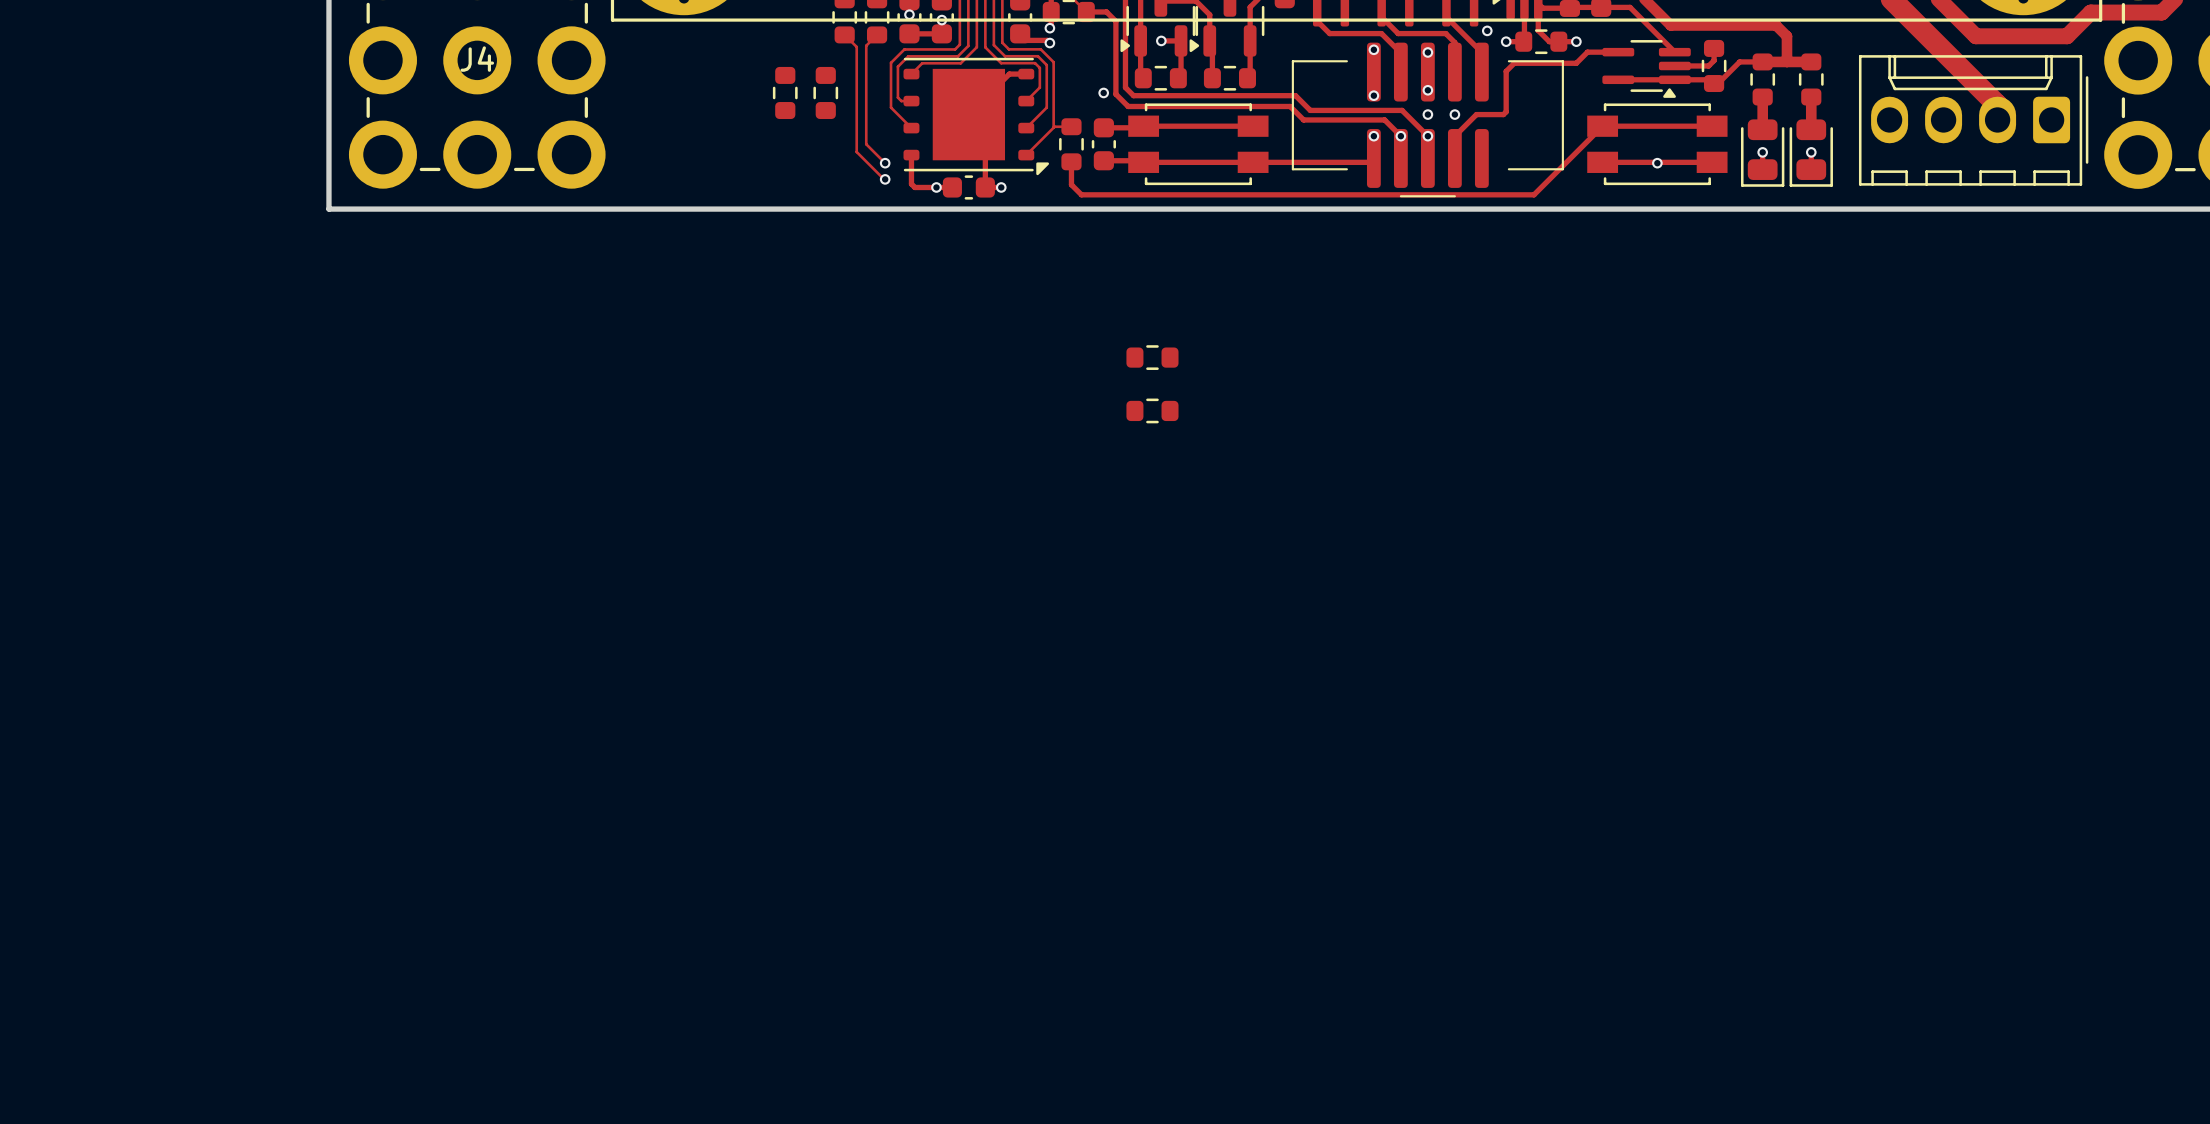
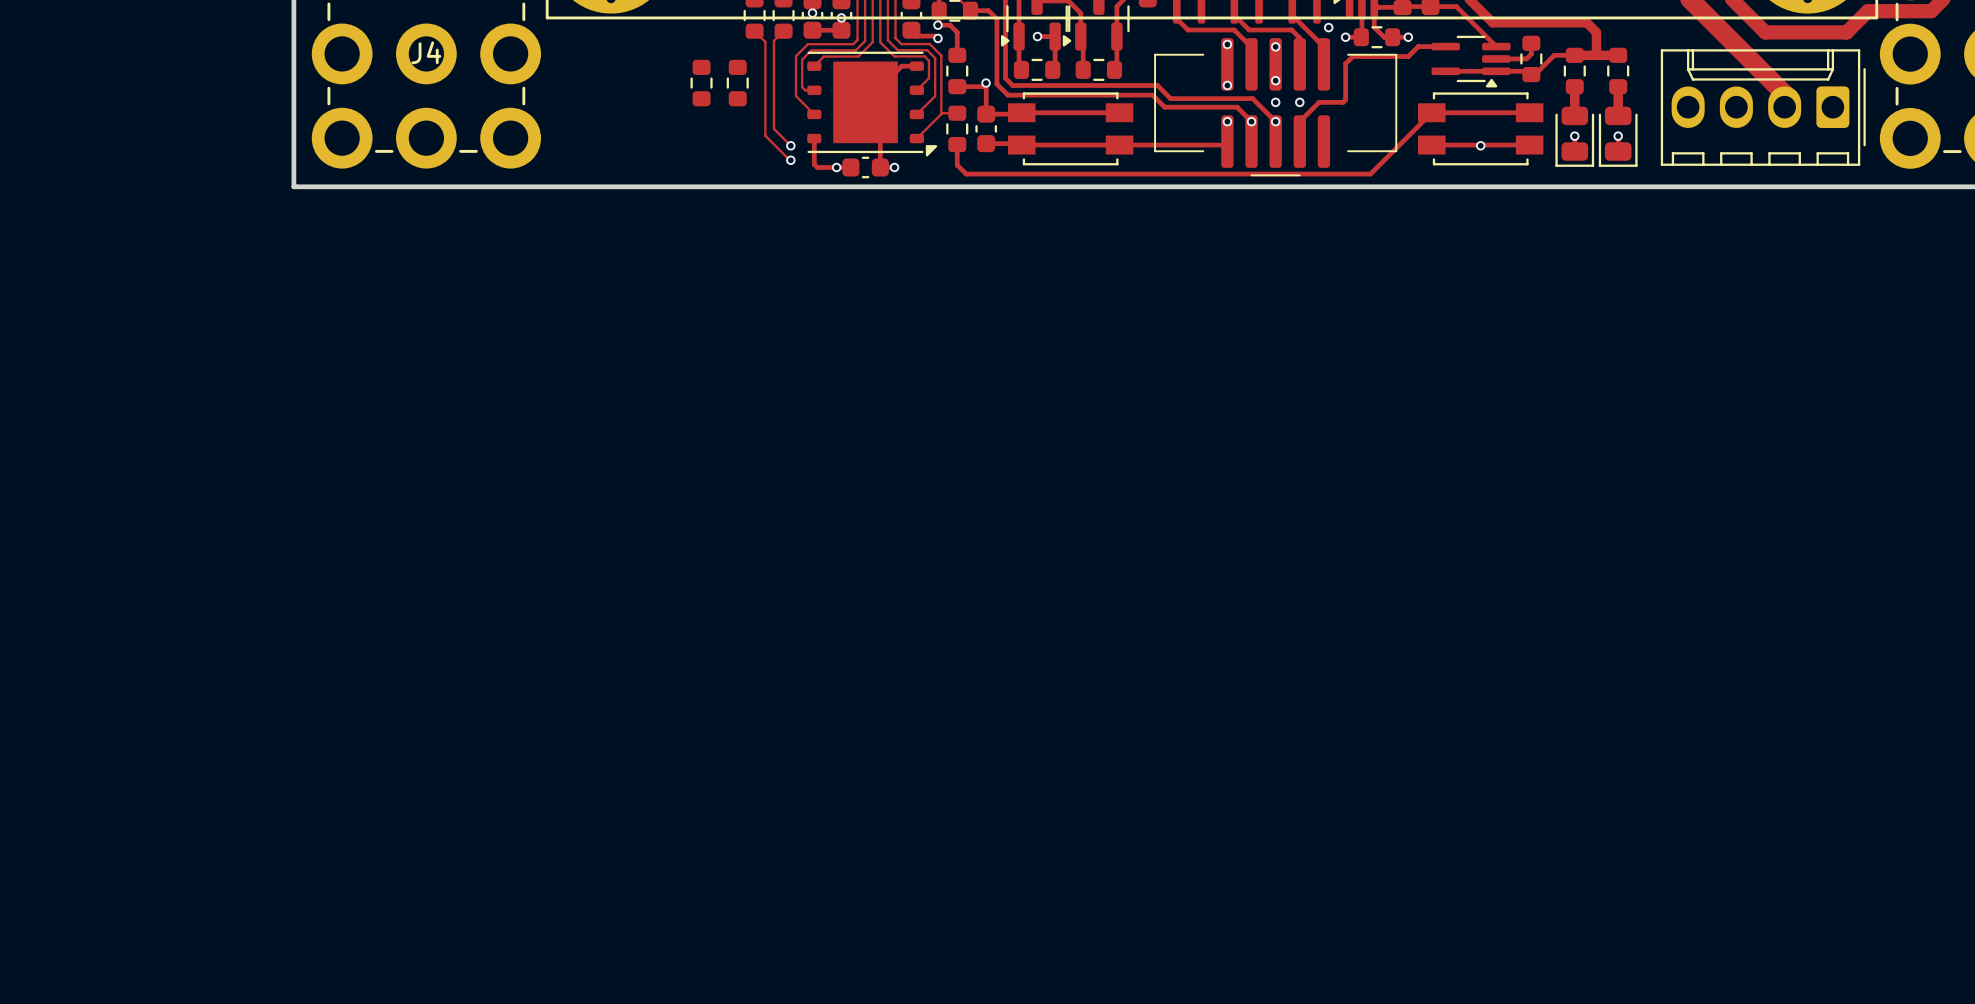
track: none -> (937, 25) (950, 25) (957, 32) (957, 55)
part: none -> (957, 71)
track: none -> (986, 85) (957, 86)
track: none -> (986, 85) (986, 114)
part: (1152, 357) -> none
part: (1152, 410) -> none

